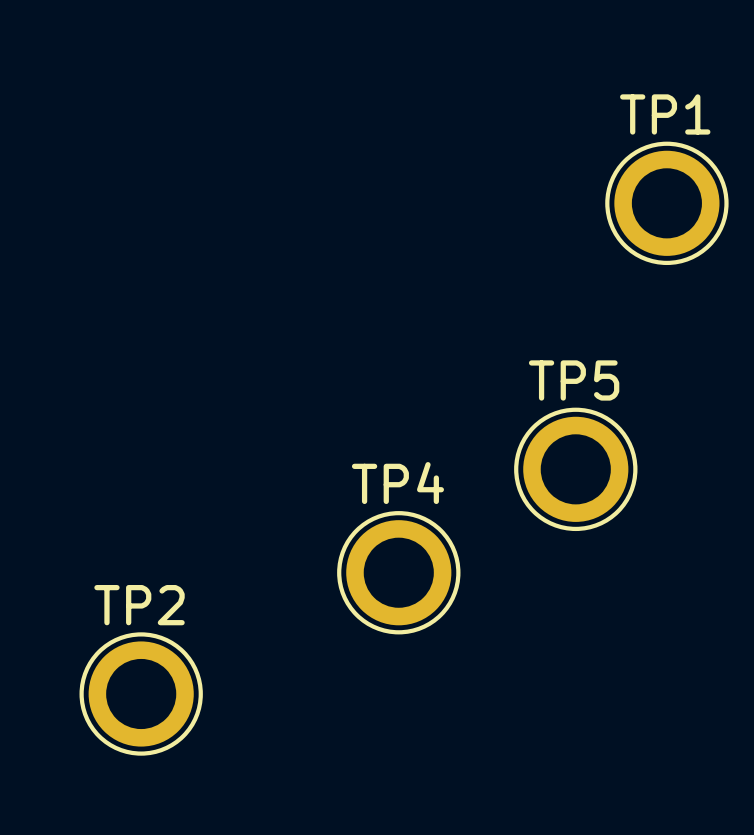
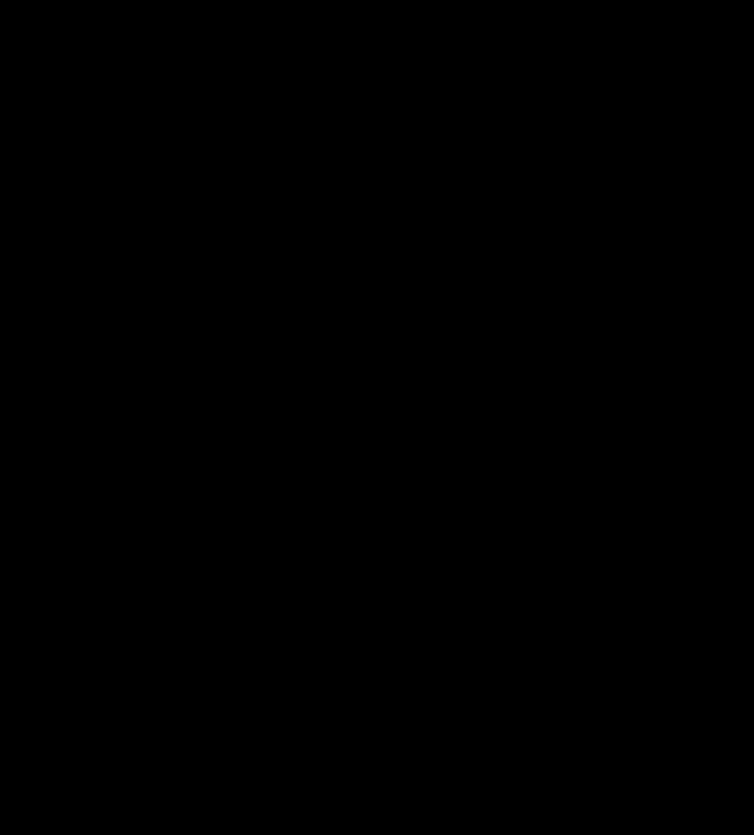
TP1: (666, 203) -> none
TP5: (575, 469) -> none
TP4: (398, 572) -> none
TP2: (141, 694) -> none

